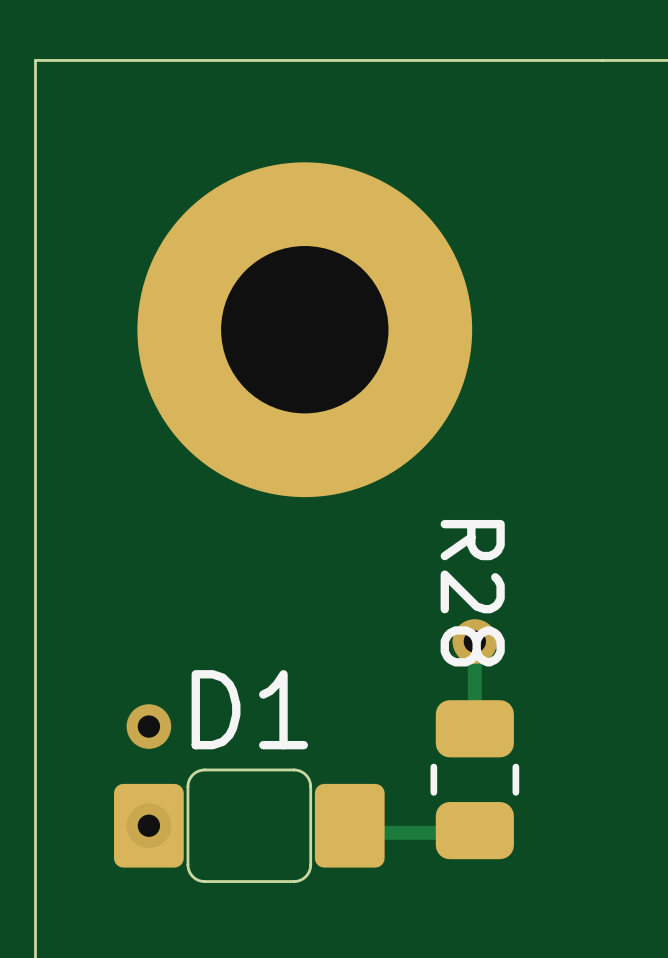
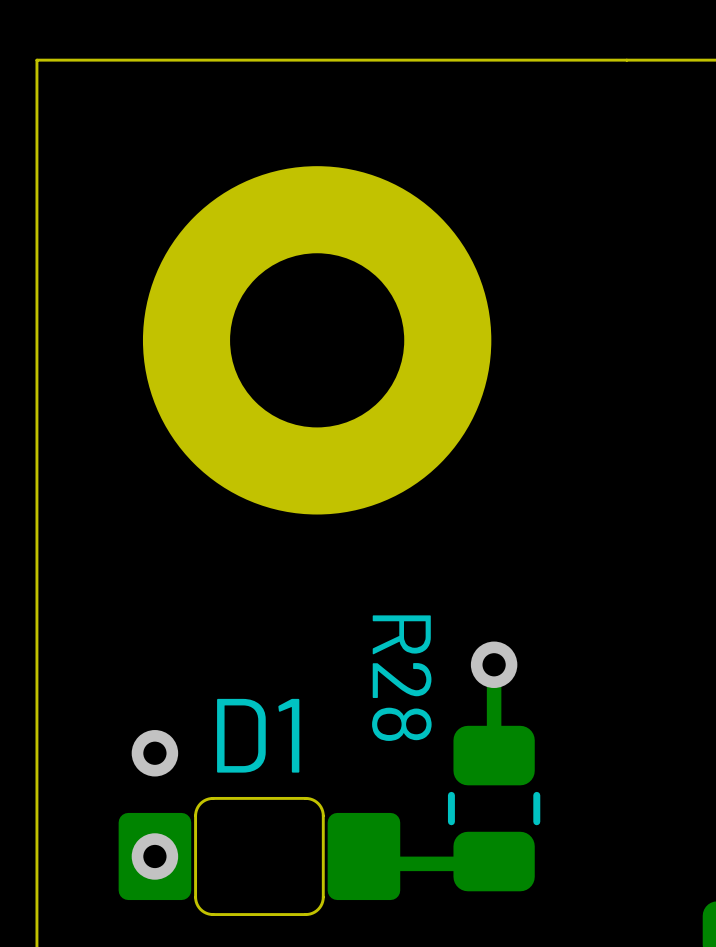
R28 name position: R28 (472, 593) -> R28 (401, 678)

